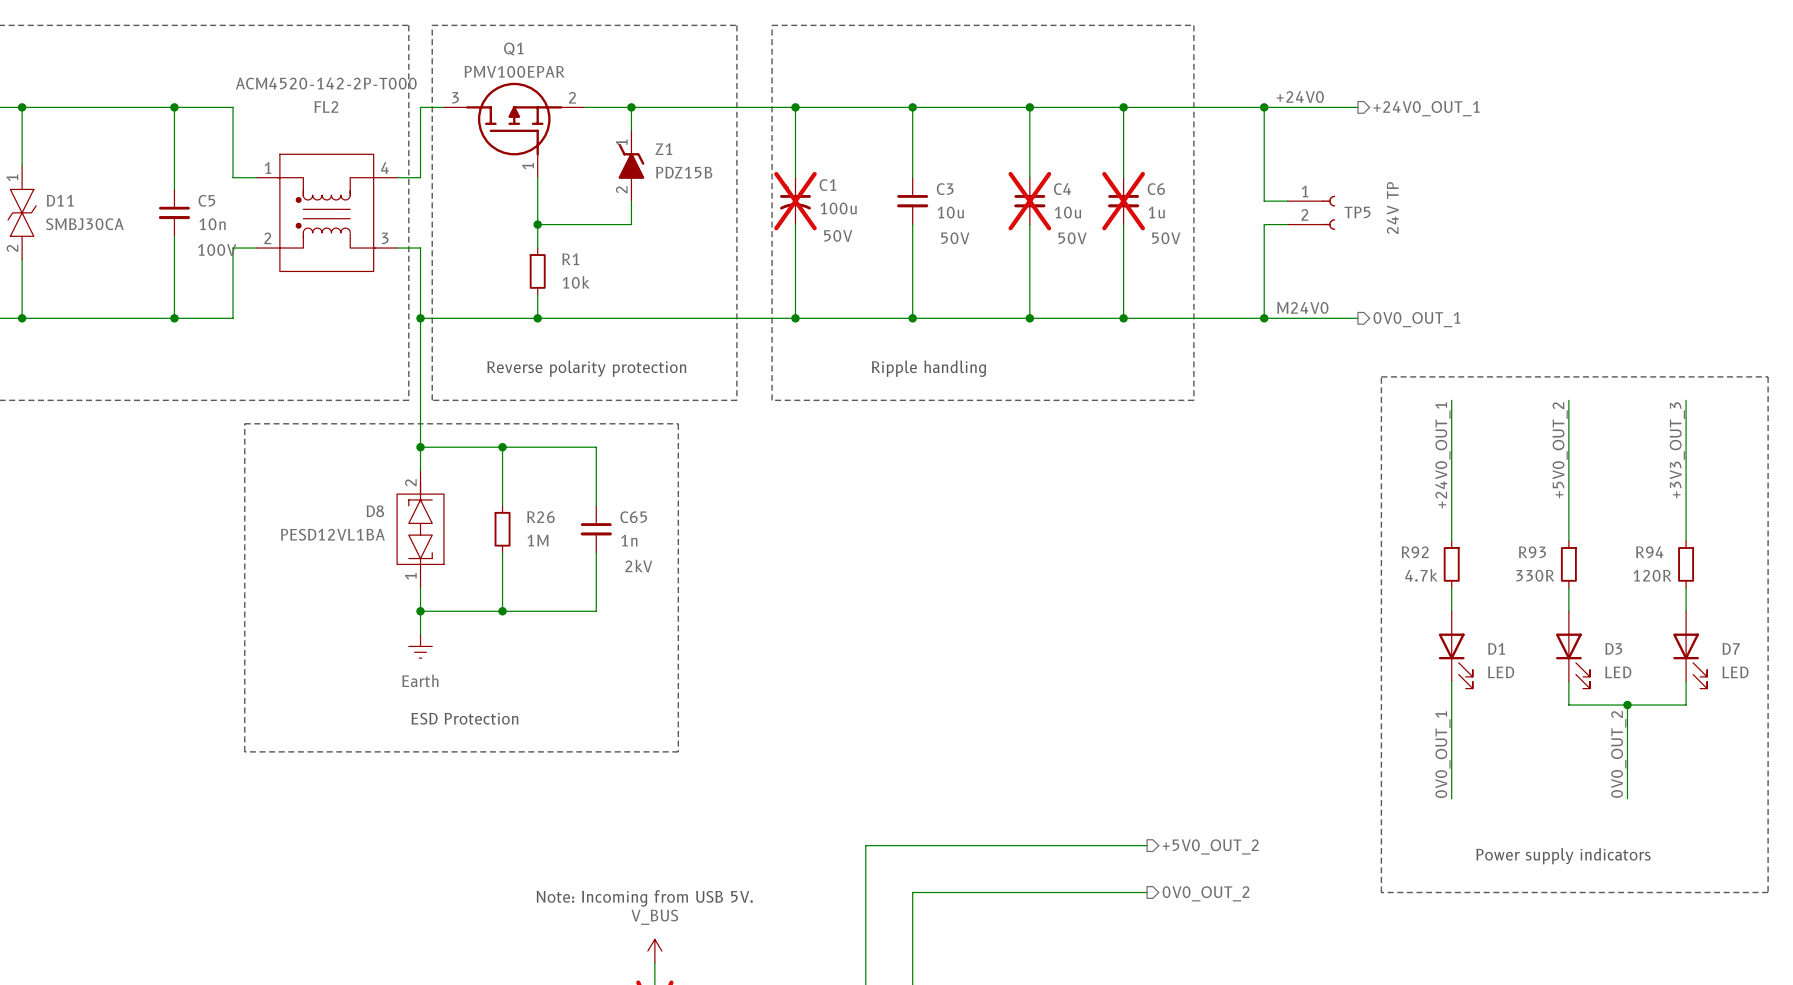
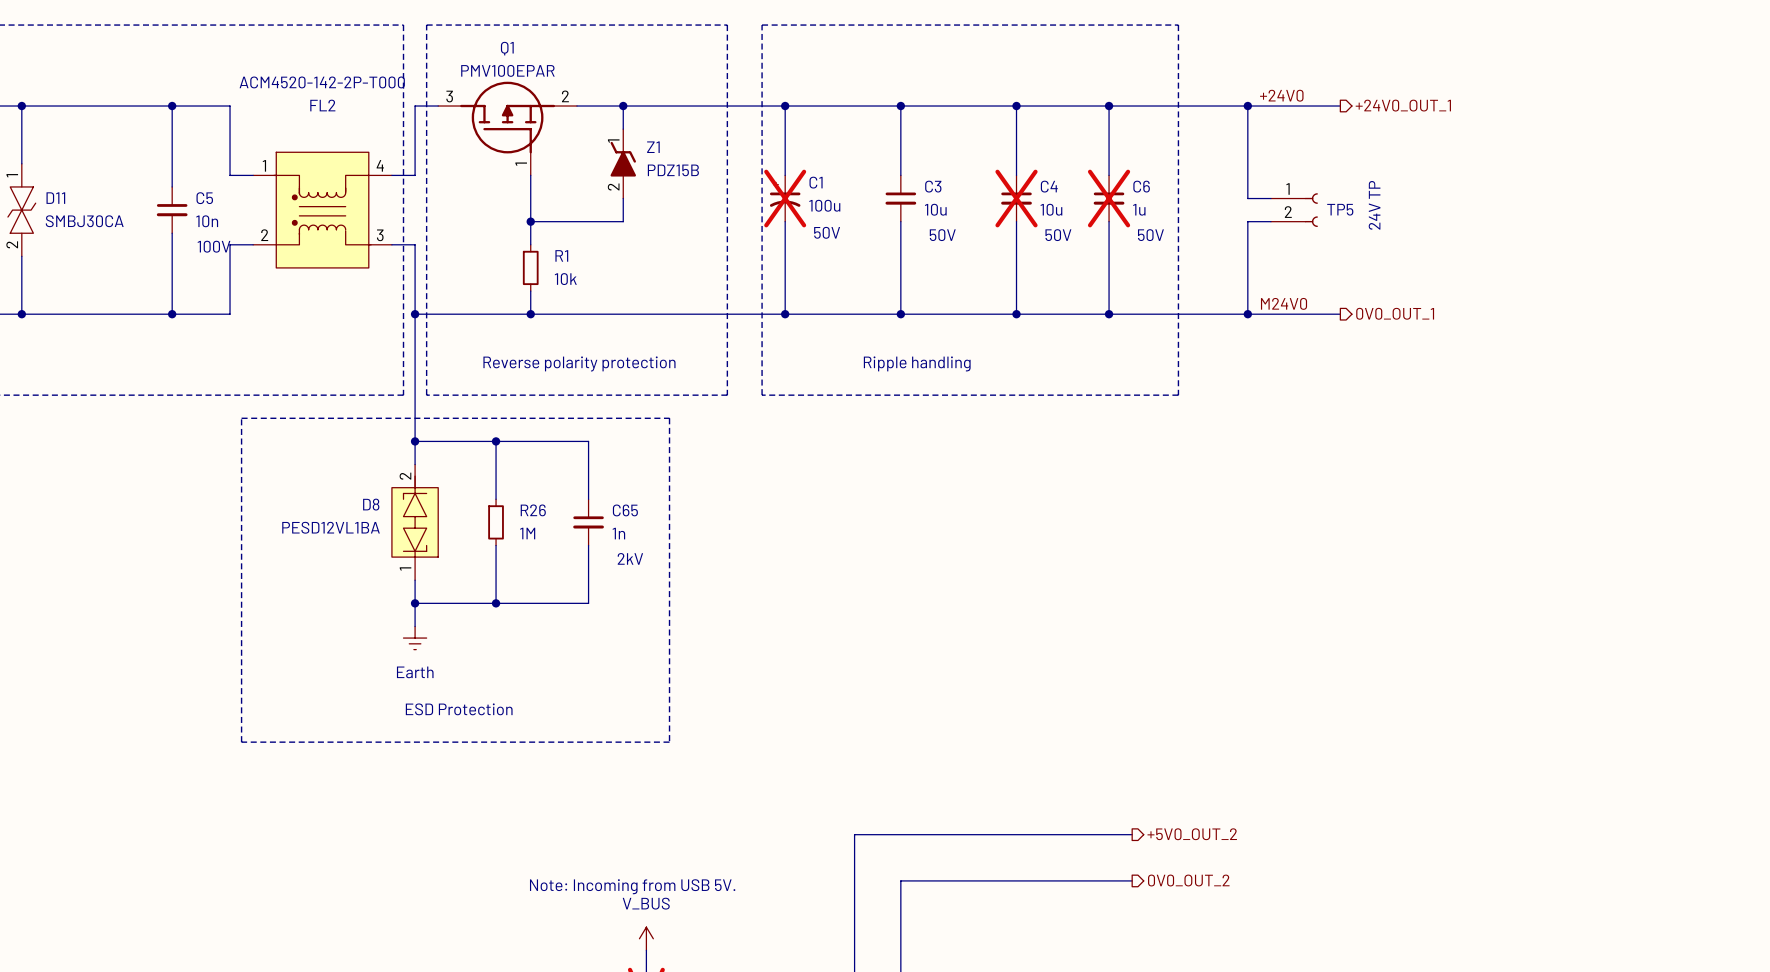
line: (1381, 376) (1768, 376) (1768, 892) (1381, 892) (1381, 376) -> none
wire: (1451, 400) (1451, 540) -> none
wire: (1568, 400) (1568, 540) -> none
wire: (1686, 400) (1686, 540) -> none
label: +5V0_OUT_2 (1560, 450) -> none
label: +3V3_OUT_3 (1677, 450) -> none
label: +24V0_OUT_1 (1443, 455) -> none
R92: 4.7k (1451, 564) -> none
R93: 330R (1568, 564) -> none
R94: 120R (1686, 564) -> none
wire: (1451, 587) (1451, 611) -> none
wire: (1568, 587) (1568, 611) -> none
wire: (1686, 587) (1686, 611) -> none
D1: LED (1455, 649) -> none
D3: LED (1572, 649) -> none
D7: LED (1690, 649) -> none
wire: (1451, 681) (1451, 798) -> none
wire: (1568, 681) (1568, 705) (1686, 705) (1686, 681) -> none
wire: (1627, 705) (1627, 798) -> none
junction: (1627, 705) -> none
label: 0V0_OUT_1 (1443, 754) -> none
label: 0V0_OUT_2 (1618, 754) -> none
text: Power supply indicators (1563, 856) -> none

